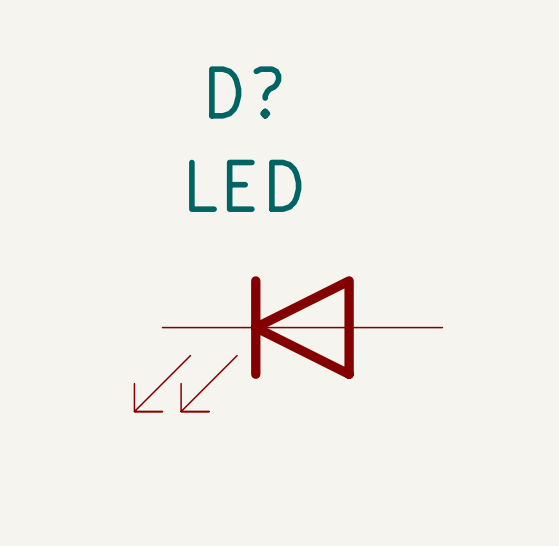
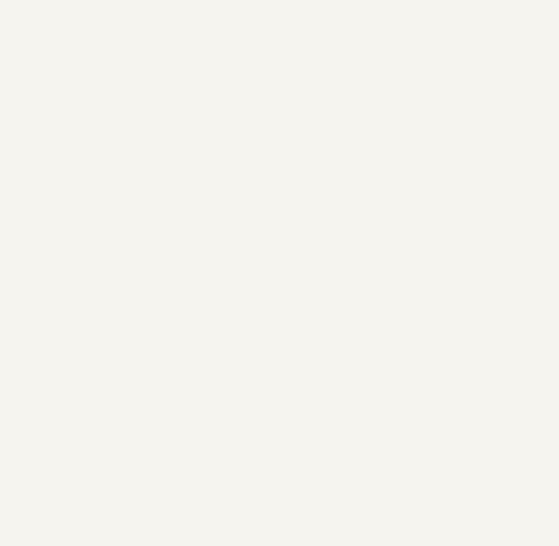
D?: LED (288, 343) -> none

